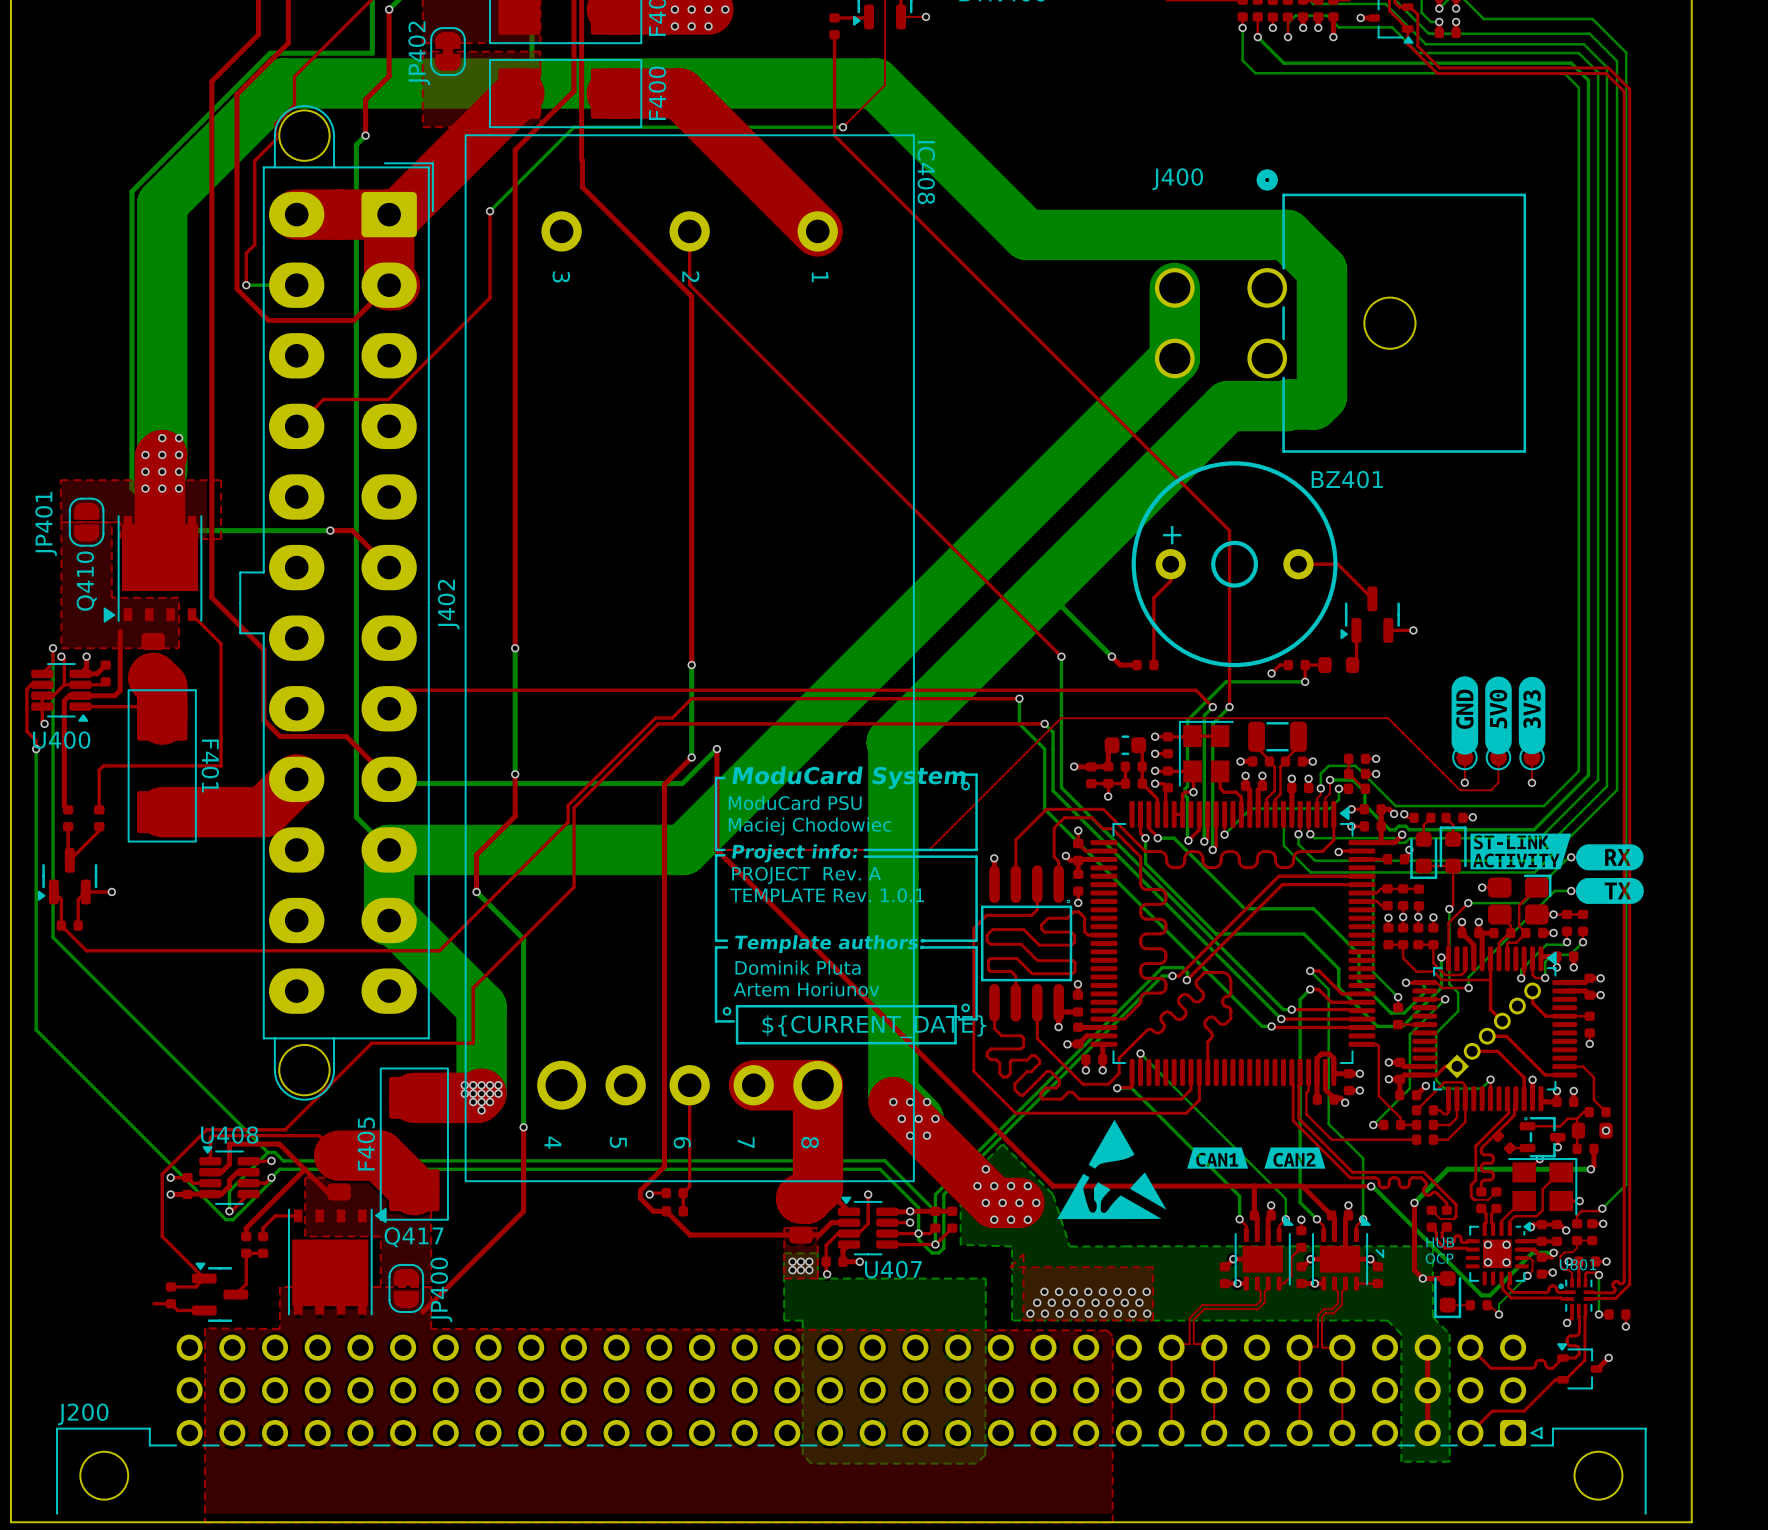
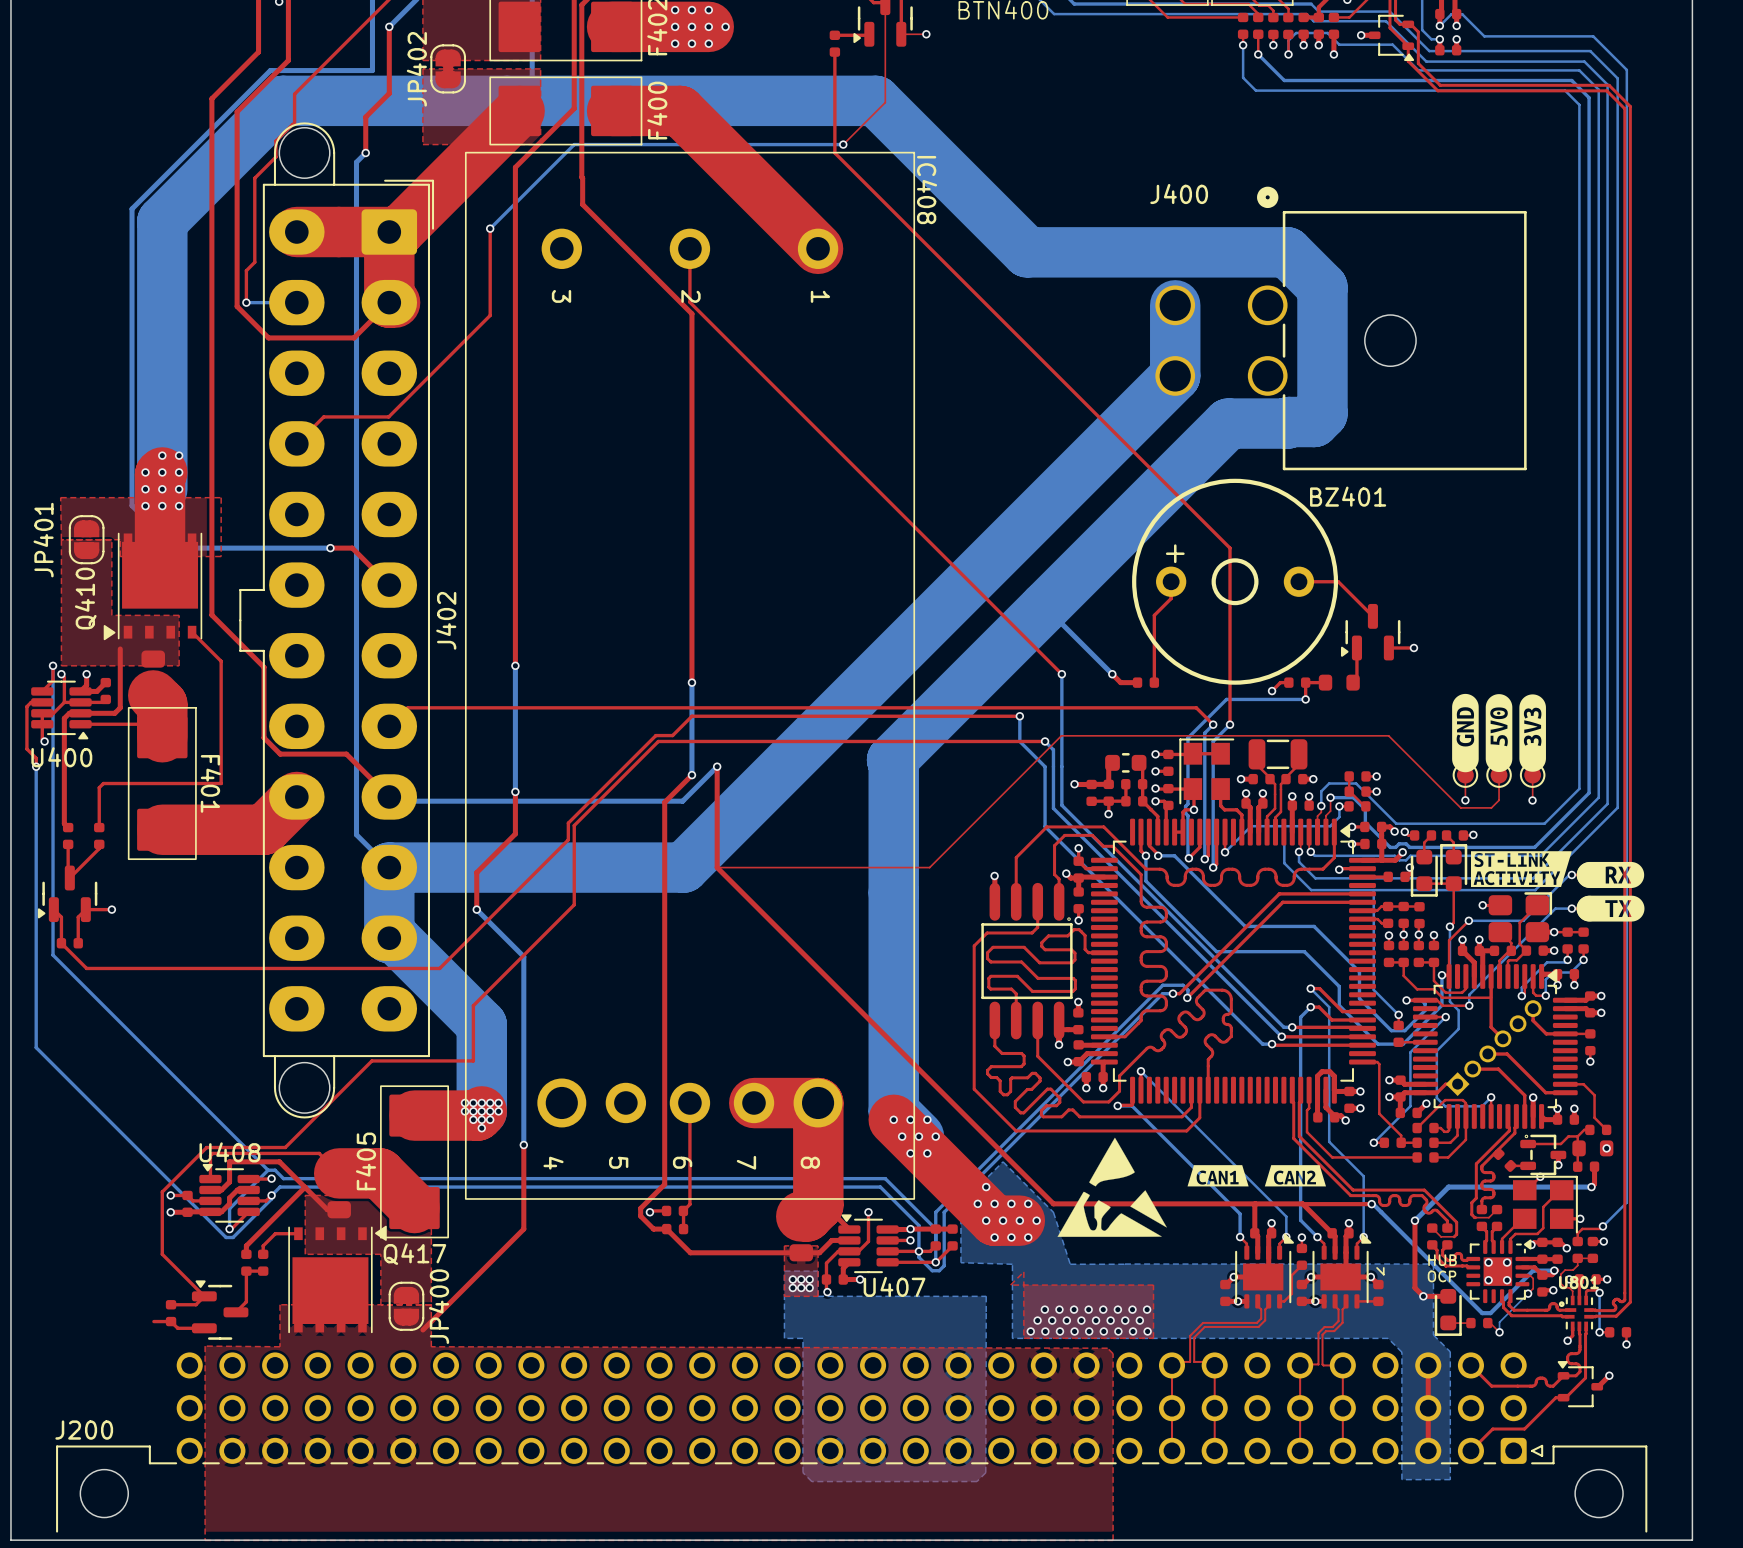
line: (958, 774) (976, 774) (976, 849) (864, 849) -> none
text: ModuCard System (849, 777) -> none
line: (724, 778) (716, 778) (716, 849) (724, 849) -> none
drawing: [961, 781, 970, 791] -> none
text: ModuCard PSU (795, 802) -> none
text: Maciej Chodowiec (810, 826) -> none
text: Project info: (794, 853) -> none
line: (724, 855) (716, 855) (716, 940) (726, 940) -> none
line: (864, 856) (976, 856) -> none
line: (976, 856) (976, 940) -> none
text: PROJECT Rev. A (806, 875) -> none
text: TEMPLATE Rev. 1.0.1 (827, 895) -> none
line: (921, 940) (976, 940) -> none
text: Template authors: (829, 944) -> none
line: (726, 947) (716, 947) (716, 1021) (733, 1021) -> none
line: (921, 947) (976, 947) (976, 1019) (958, 1019) -> none
text: Dominik Pluta (797, 967) -> none
text: Artem Horiunov (806, 989) -> none
drawing: [961, 1003, 970, 1013] -> none
line: (737, 1006) (955, 1006) (955, 1043) (737, 1043) (737, 1006) -> none
drawing: [722, 1007, 732, 1016] -> none
text: ${CURRENT_DATE} (874, 1026) -> none

